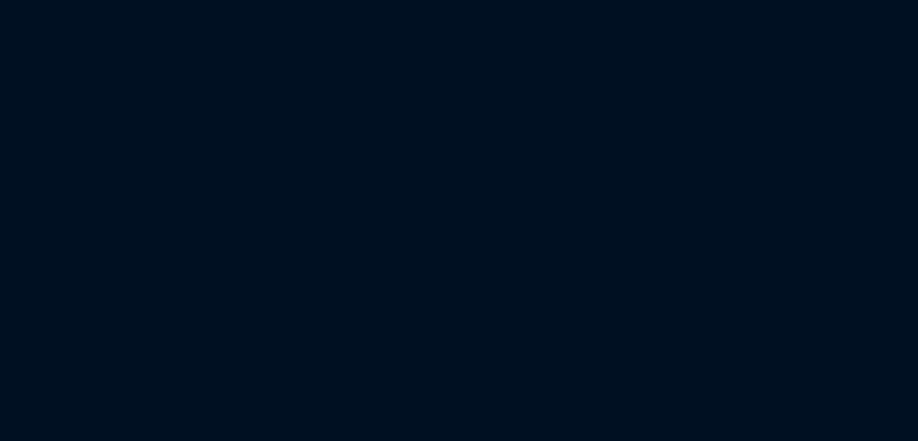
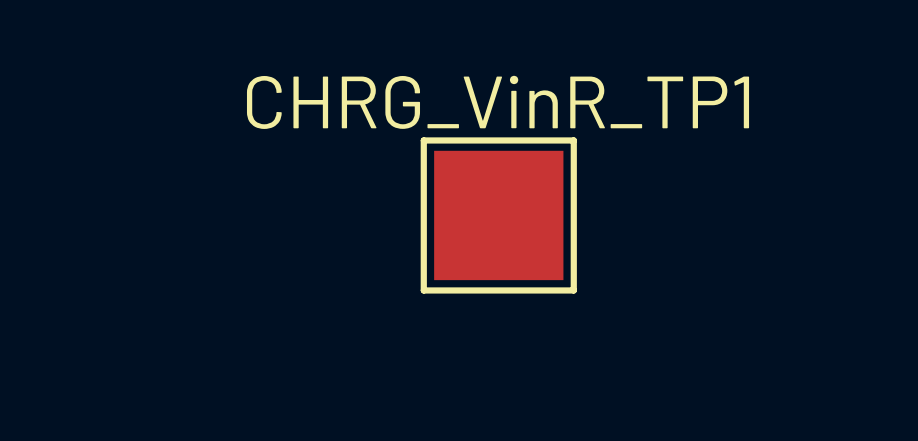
CHRG_VinR_TP1: none -> (498, 215)

